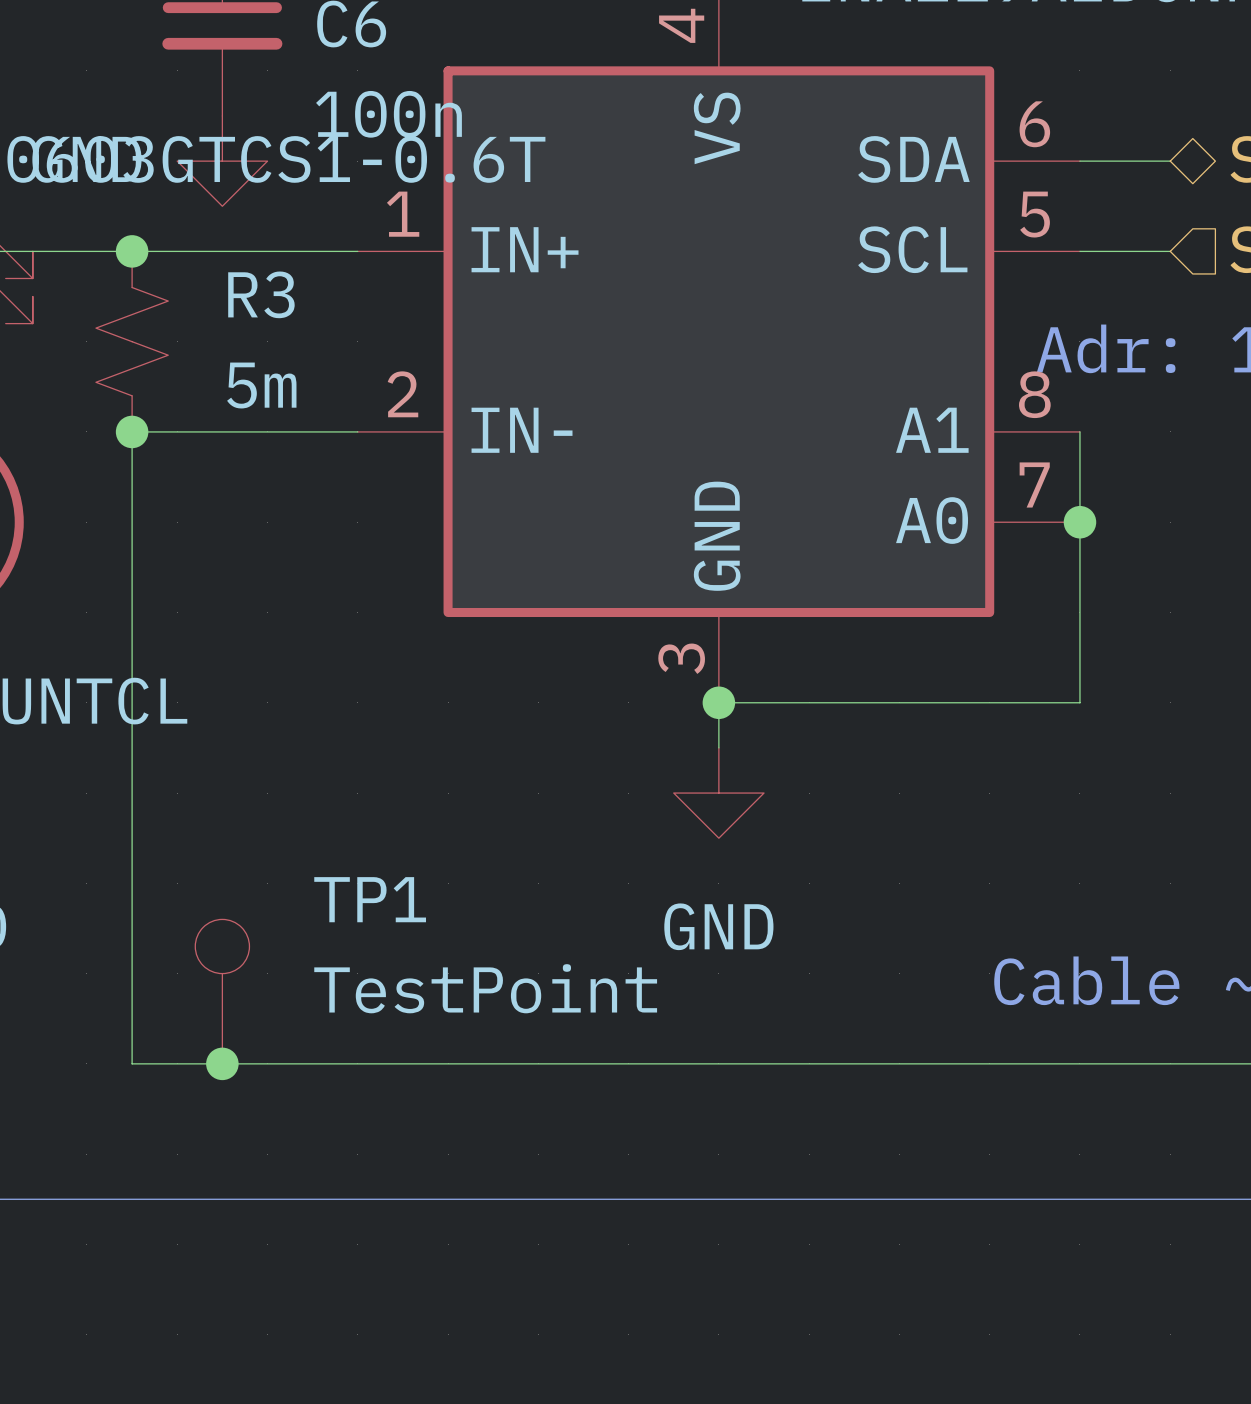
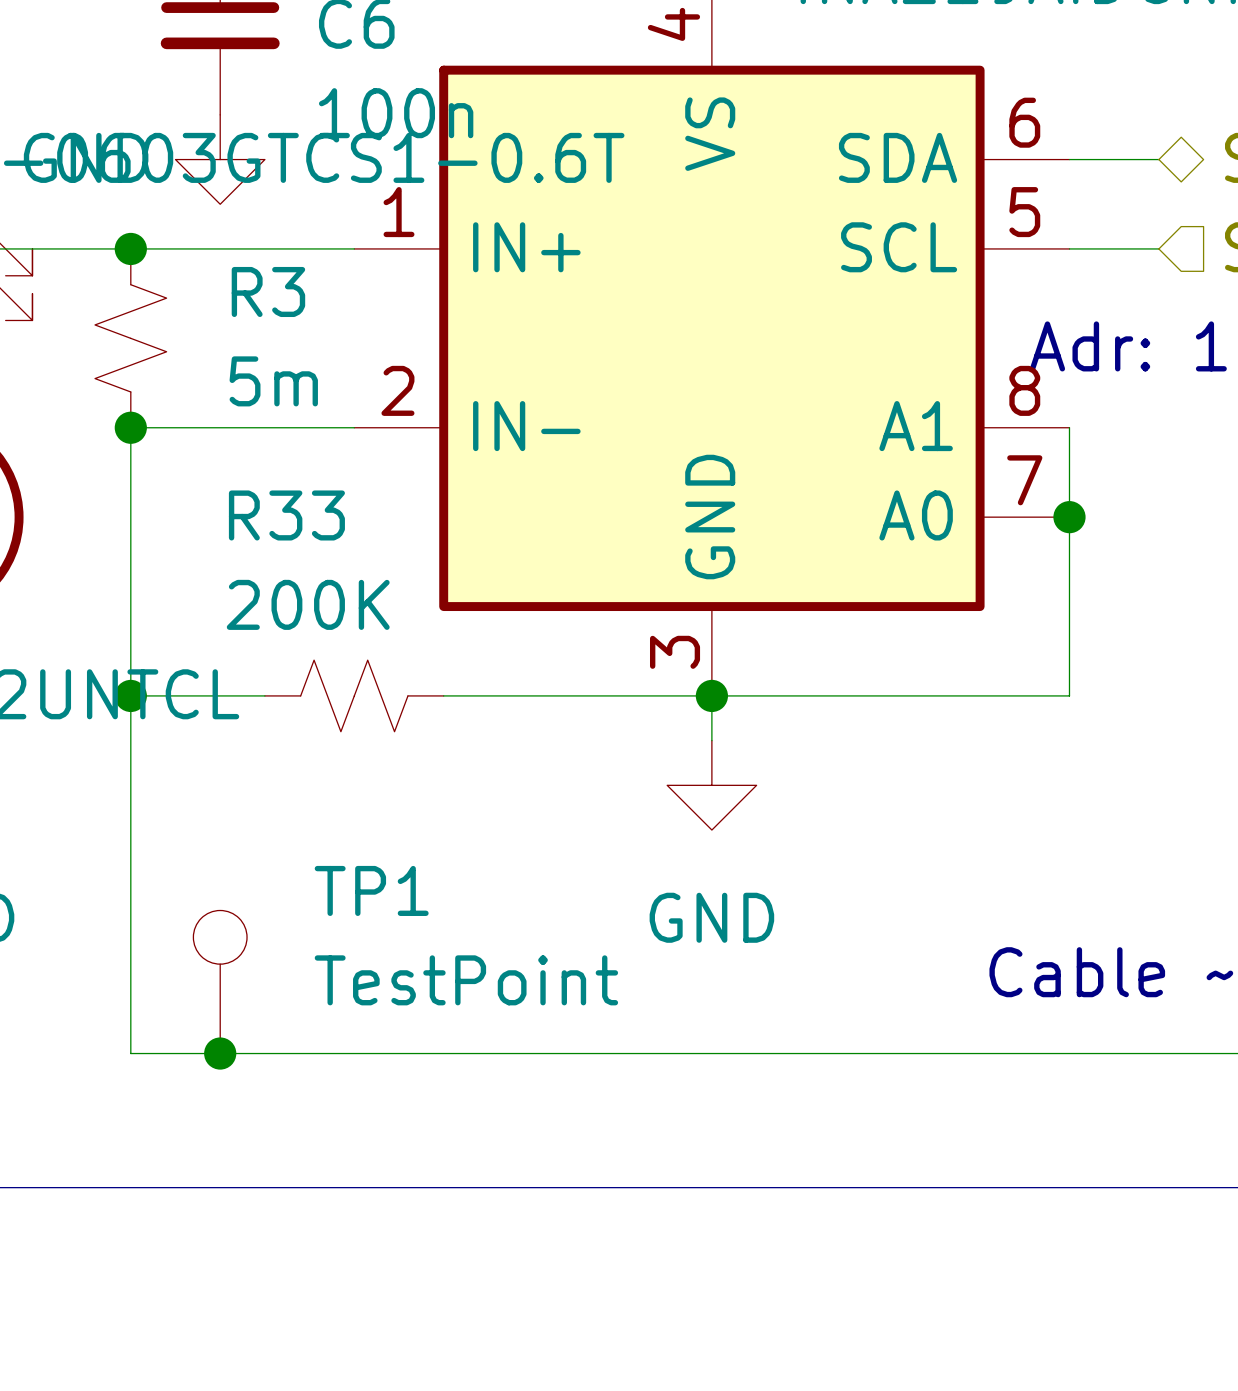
wire: none -> (130, 695) (264, 695)
junction: none -> (130, 695)
R33: none -> 200K (354, 695)
wire: none -> (443, 695) (711, 695)

